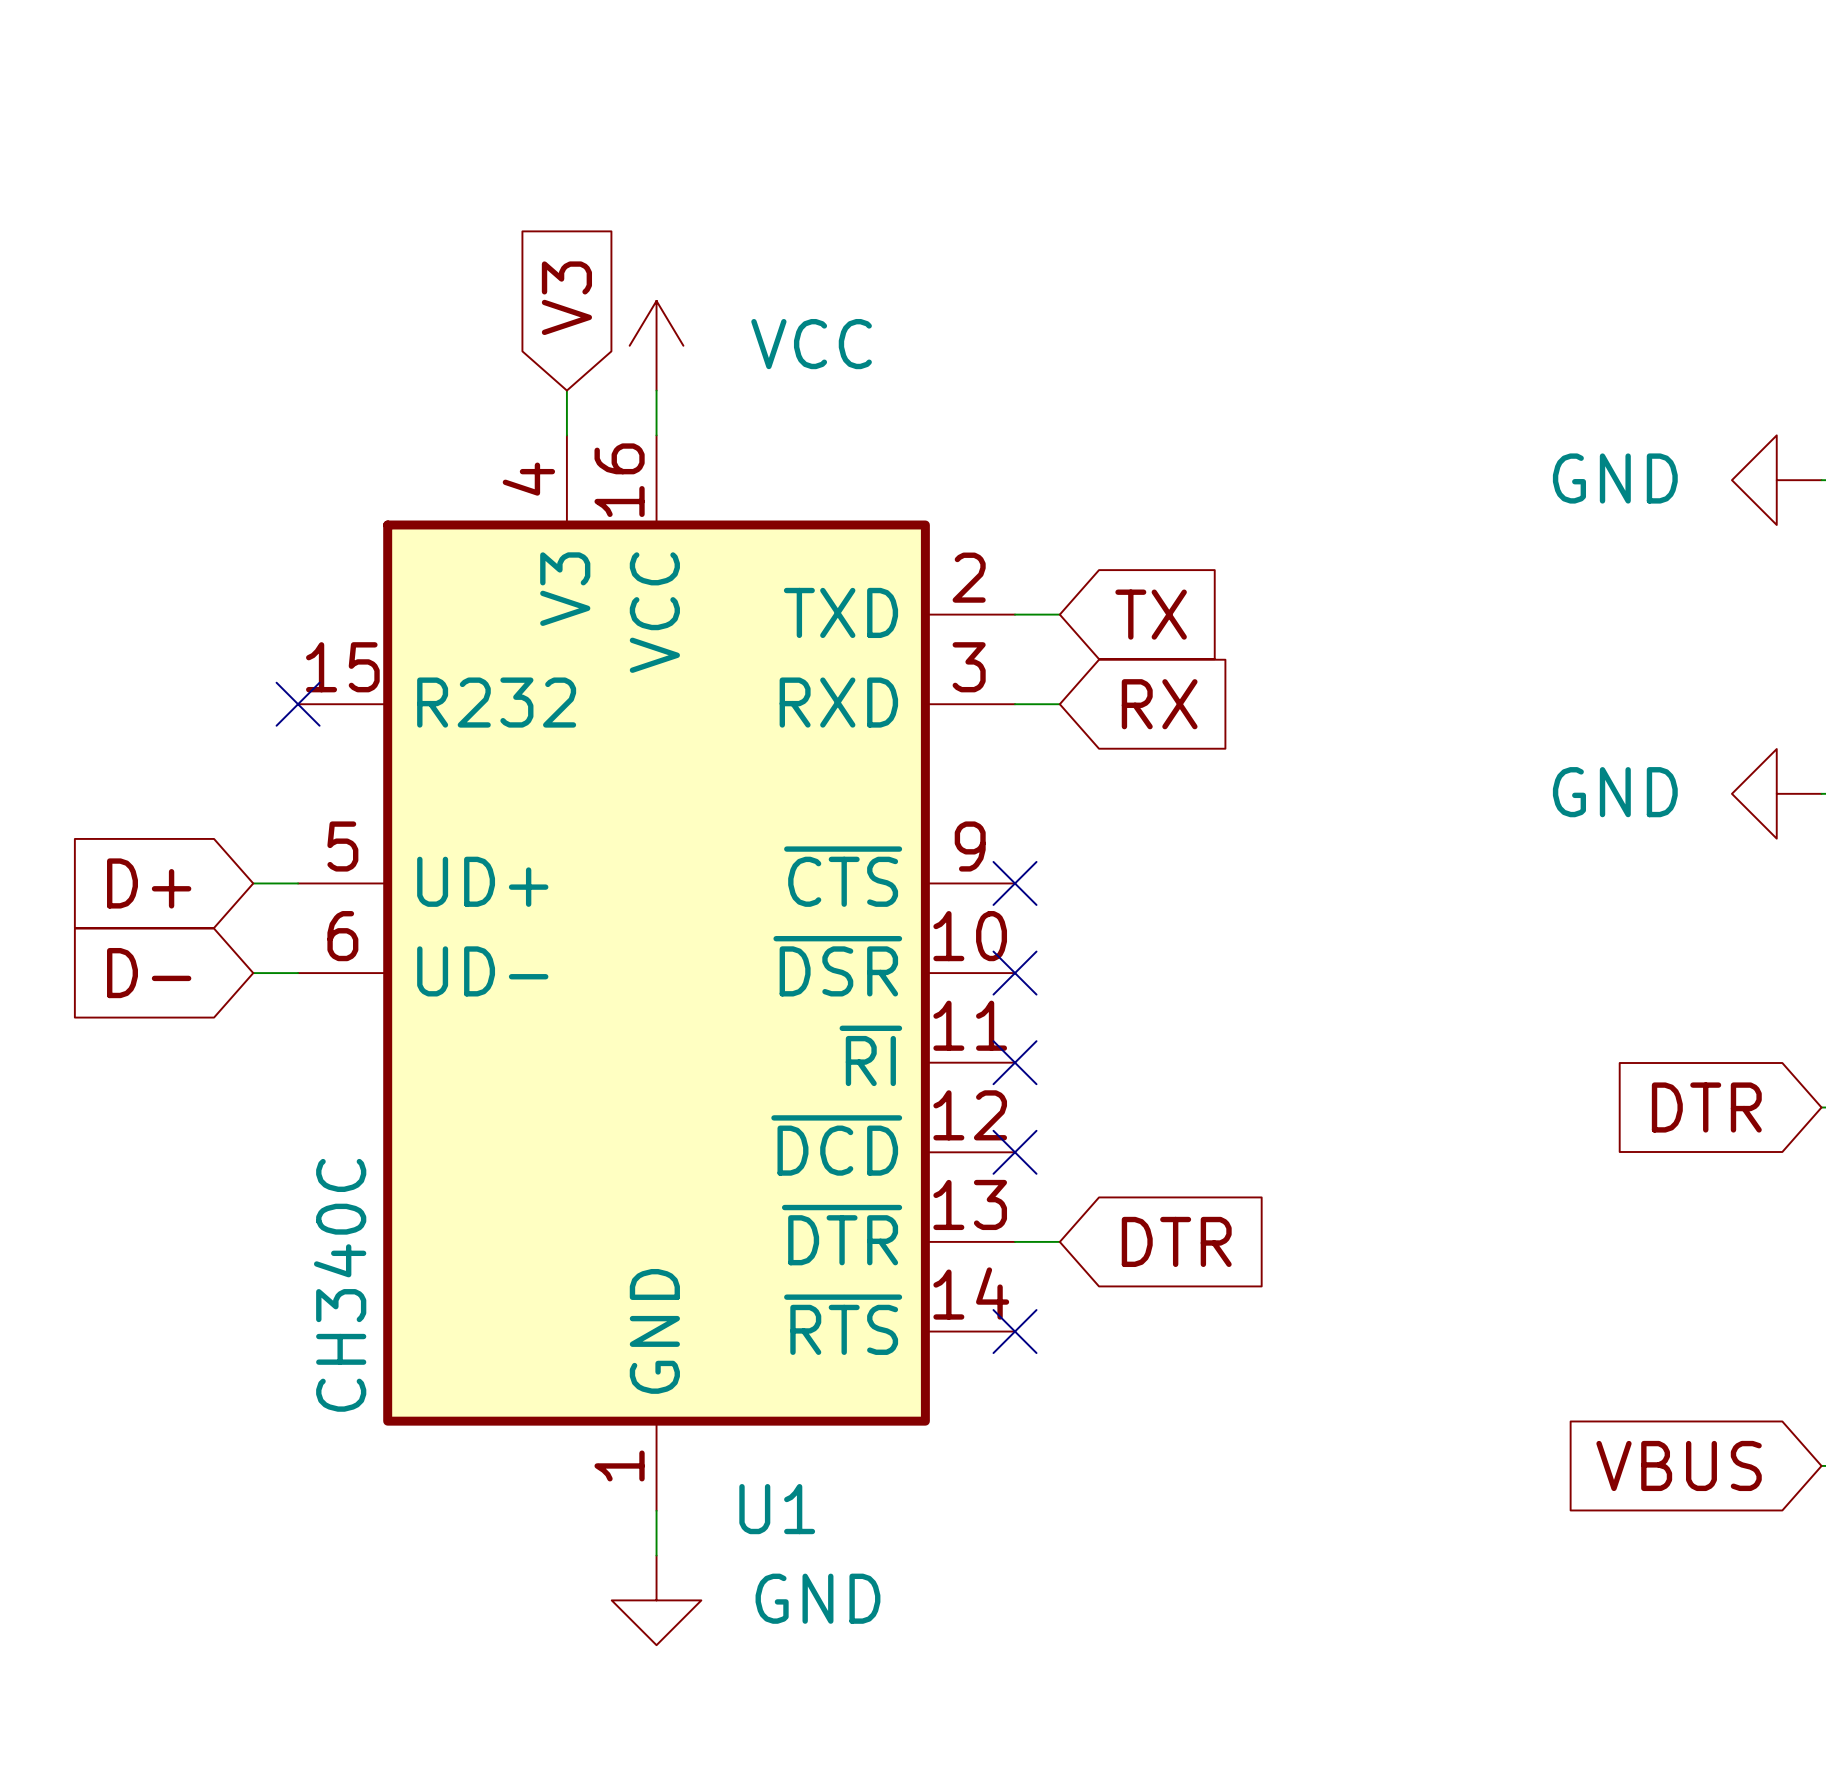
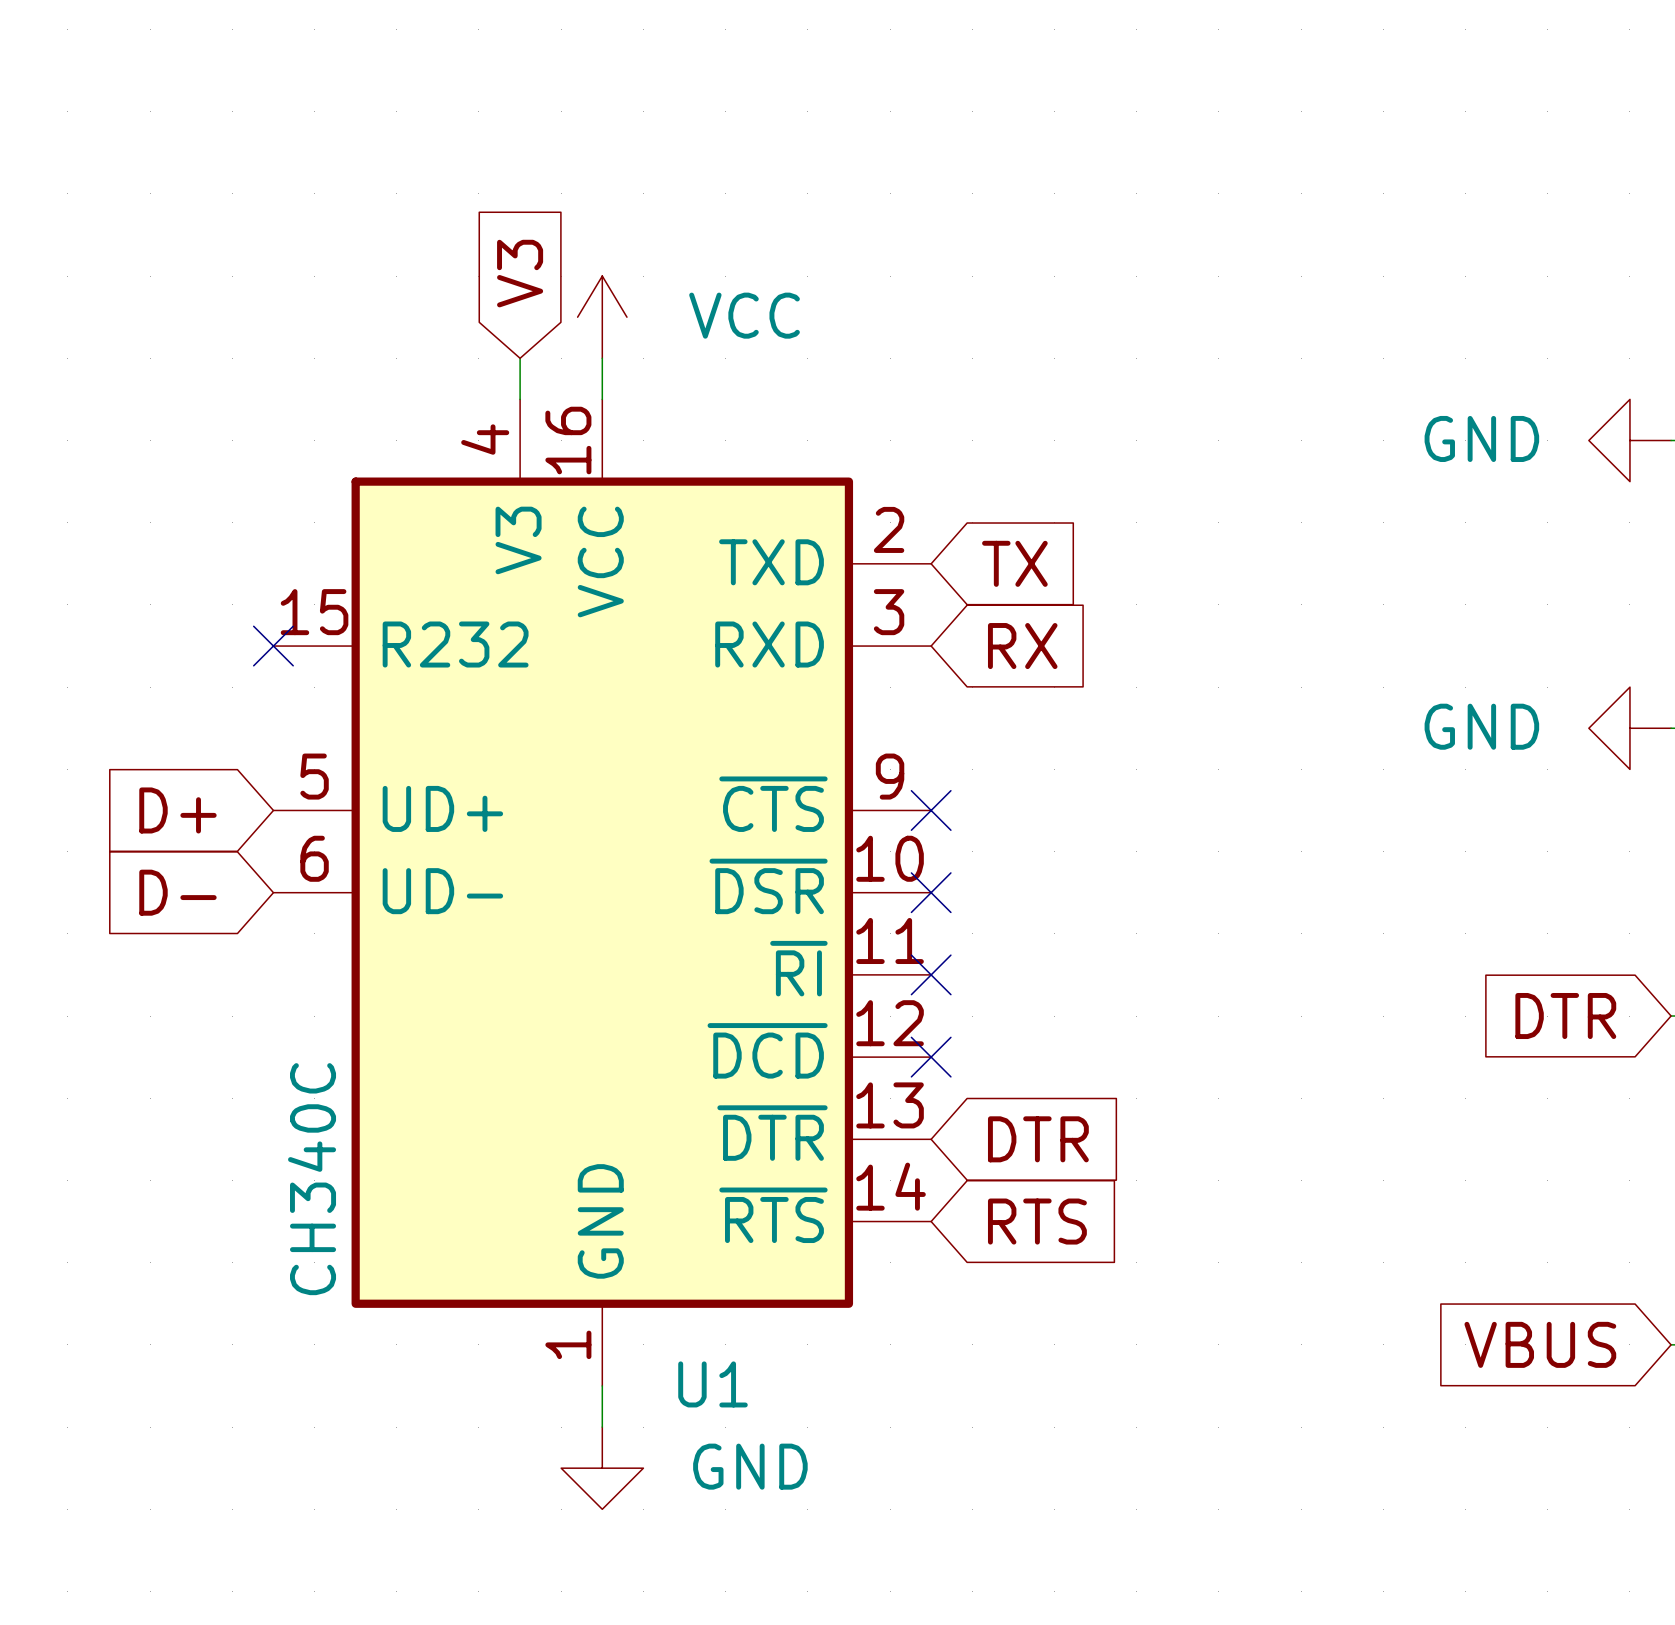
wire: (1015, 614) (1059, 614) -> none
global label position: TX (1151, 614) -> TX (1014, 563)
wire: (1015, 704) (1059, 704) -> none
global label position: RX (1159, 704) -> RX (1022, 646)
global label position: D+ (149, 883) -> D+ (177, 810)
wire: (253, 883) (298, 883) -> none
global label position: D- (149, 973) -> D- (177, 892)
wire: (253, 973) (298, 973) -> none
wire: (1015, 1241) (1059, 1241) -> none
global label position: DTR (1176, 1241) -> DTR (1038, 1139)
no-connect mark: (1015, 1331) -> none
global label: none -> RTS (1037, 1221)

